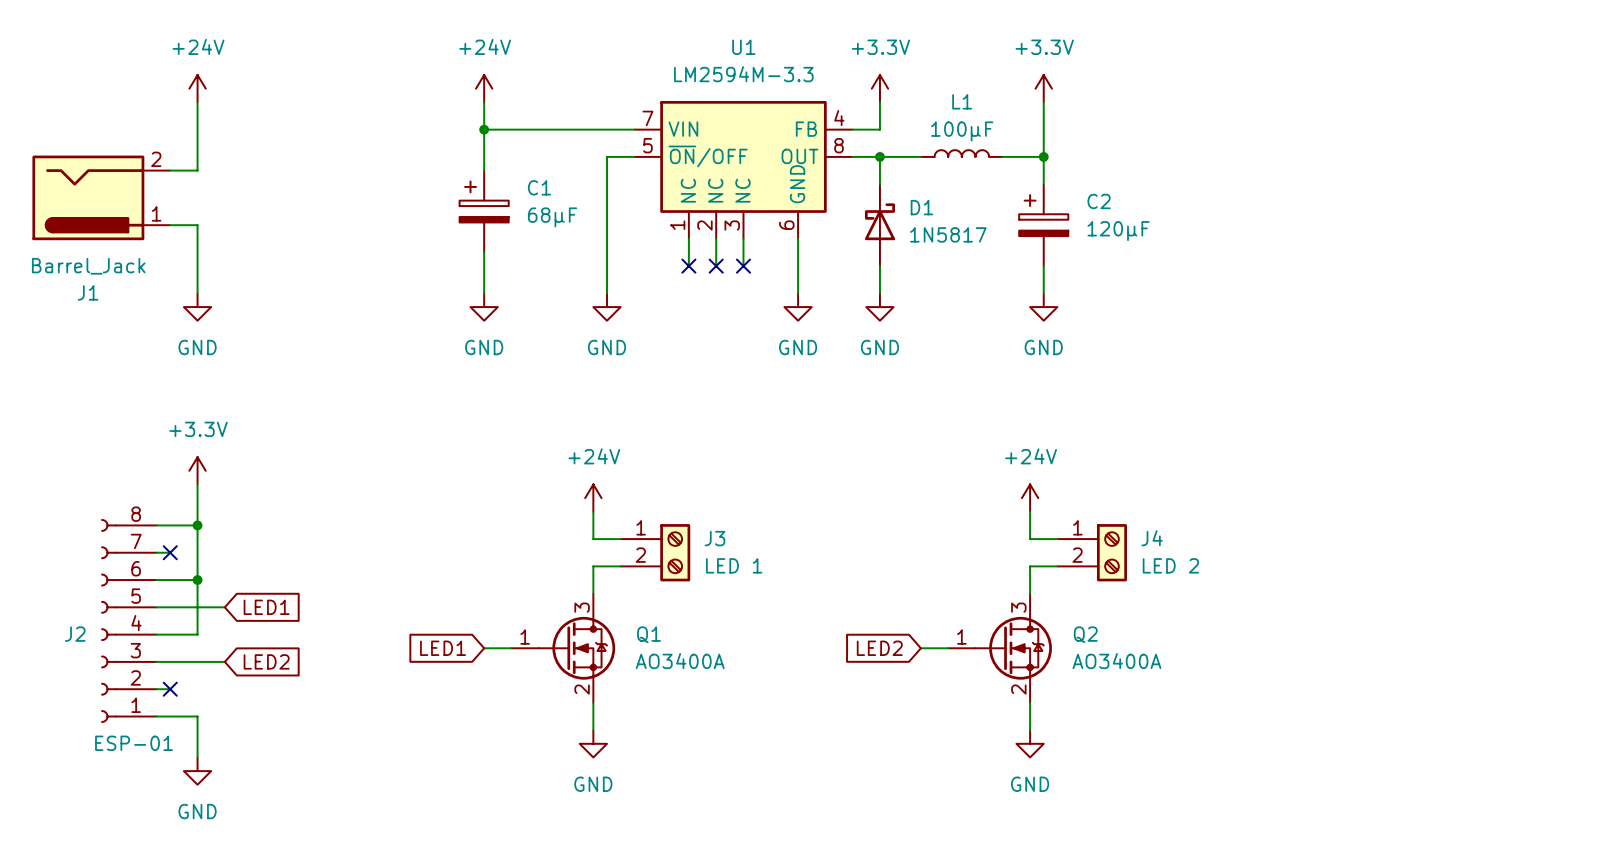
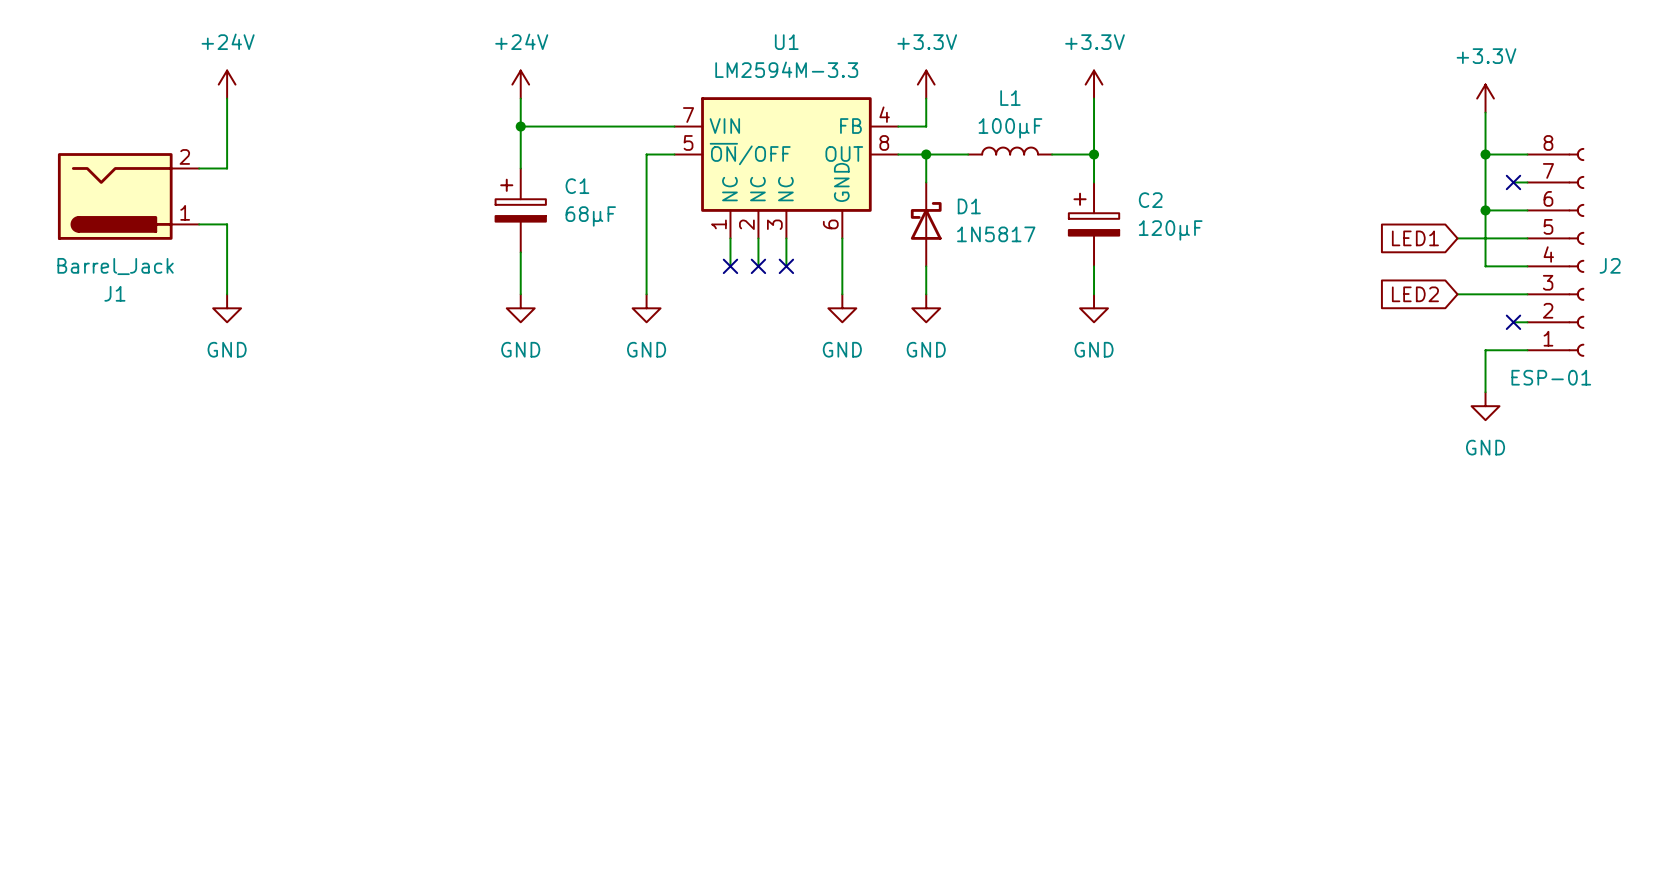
power symbol: none -> +3.3V (1485, 98)
wire: none -> (1485, 112) (1485, 266) (1527, 266)
wire: none -> (1485, 154) (1527, 154)
junction: none -> (1485, 154)
wire: none -> (1513, 182) (1527, 182)
no-connect mark: none -> (1513, 182)
wire: none -> (1485, 210) (1527, 210)
junction: none -> (1485, 210)
global label: none -> LED1 (1415, 238)
wire: none -> (1457, 238) (1527, 238)
global label: none -> LED2 (1415, 294)
wire: none -> (1457, 294) (1527, 294)
wire: none -> (1513, 322) (1527, 322)
no-connect mark: none -> (1513, 322)
wire: none -> (1527, 350) (1485, 350) (1485, 392)
power symbol: none -> GND (1485, 406)
power symbol: +3.3V (197, 470) -> none
wire: (197, 484) (197, 634) (156, 634) -> none
power symbol: +24V (593, 498) -> none
power symbol: +24V (1030, 498) -> none
wire: (593, 511) (593, 539) (620, 539) -> none
wire: (1030, 511) (1030, 539) (1057, 539) -> none
wire: (156, 525) (197, 525) -> none
junction: (197, 525) -> none
wire: (156, 552) (170, 552) -> none
no-connect mark: (170, 552) -> none
J3: LED 1 (655, 552) -> none
J4: LED 2 (1092, 552) -> none
wire: (620, 566) (593, 566) (593, 593) -> none
wire: (1057, 566) (1030, 566) (1030, 593) -> none
wire: (156, 580) (197, 580) -> none
junction: (197, 580) -> none
wire: (156, 607) (224, 607) -> none
global label: LED1 (266, 607) -> none
J2 flip: as is (108, 620) -> left-right (1576, 252)
J2 position: (128, 620) -> (1555, 252)
global label: LED1 (443, 648) -> none
wire: (484, 648) (511, 648) -> none
Q1: AO3400A (563, 648) -> none
global label: LED2 (879, 648) -> none
wire: (920, 648) (948, 648) -> none
Q2: AO3400A (1000, 648) -> none
wire: (156, 661) (224, 661) -> none
global label: LED2 (266, 661) -> none
wire: (156, 689) (170, 689) -> none
no-connect mark: (170, 689) -> none
wire: (593, 702) (593, 730) -> none
wire: (1030, 702) (1030, 730) -> none
wire: (156, 716) (197, 716) (197, 757) -> none
power symbol: GND (593, 743) -> none
power symbol: GND (1030, 743) -> none
power symbol: GND (197, 771) -> none

